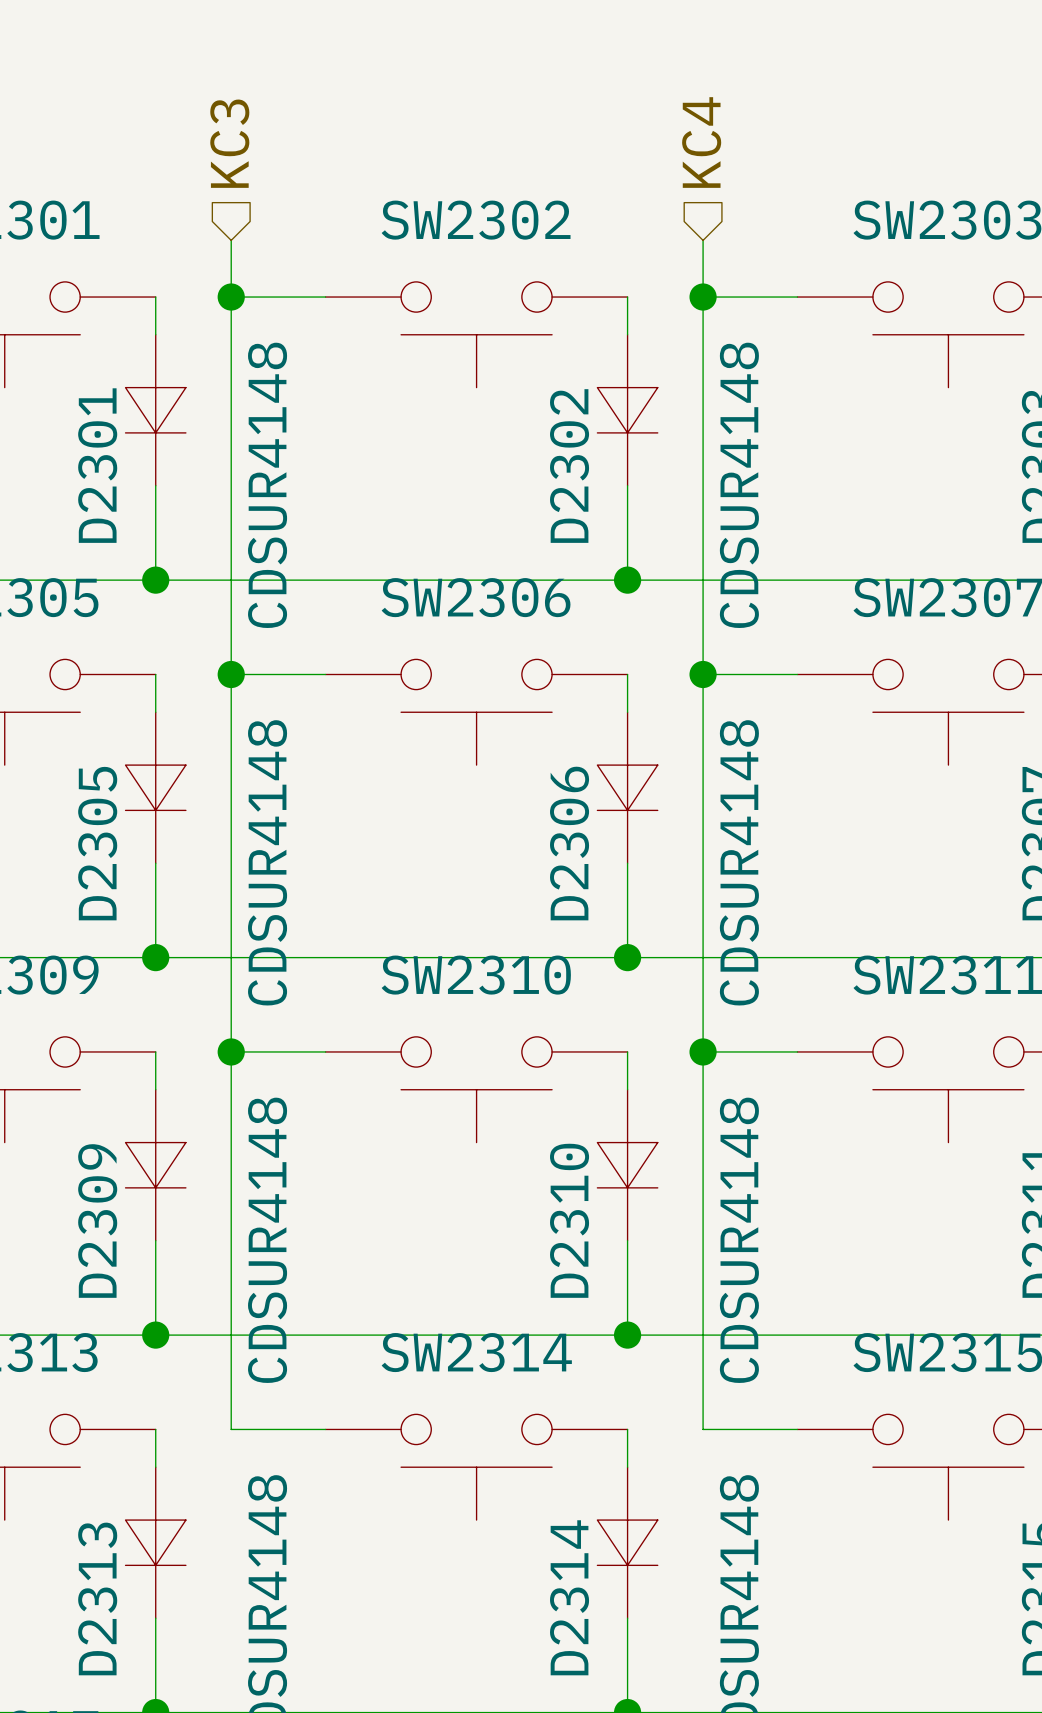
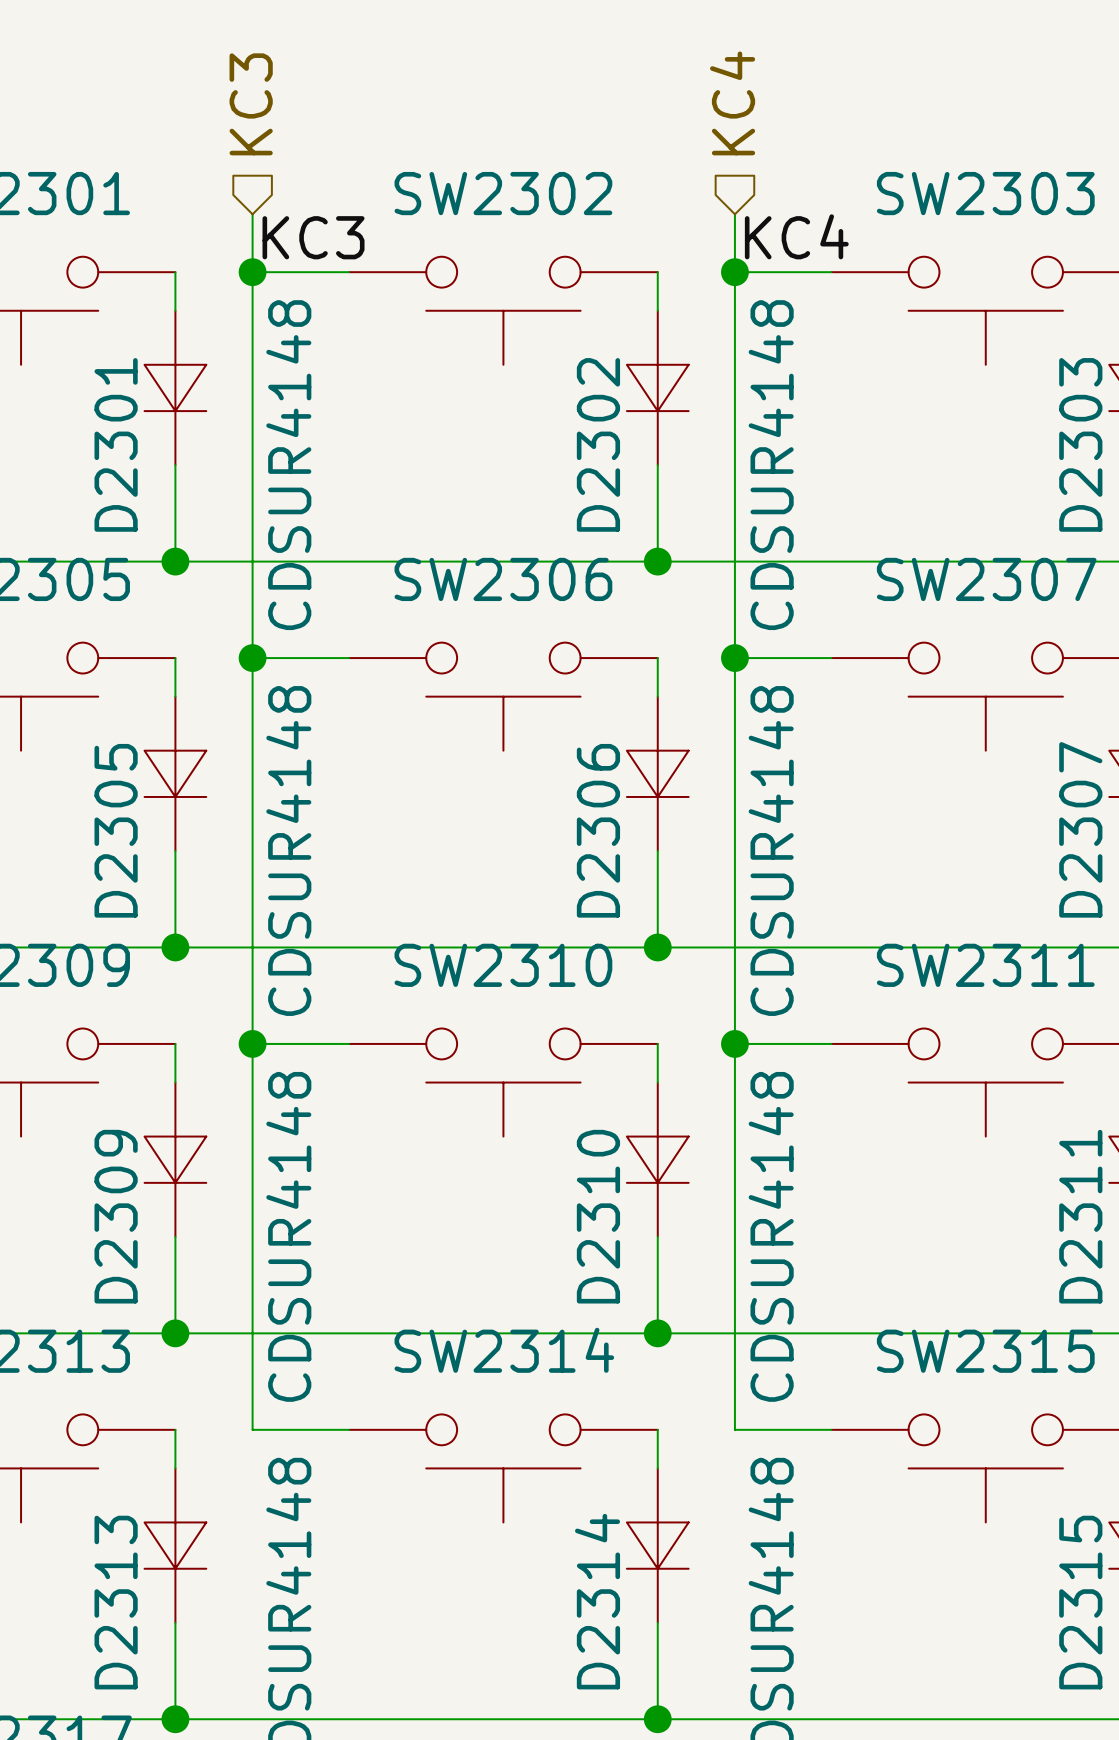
label: none -> KC3 (313, 237)
label: none -> KC4 (796, 236)

